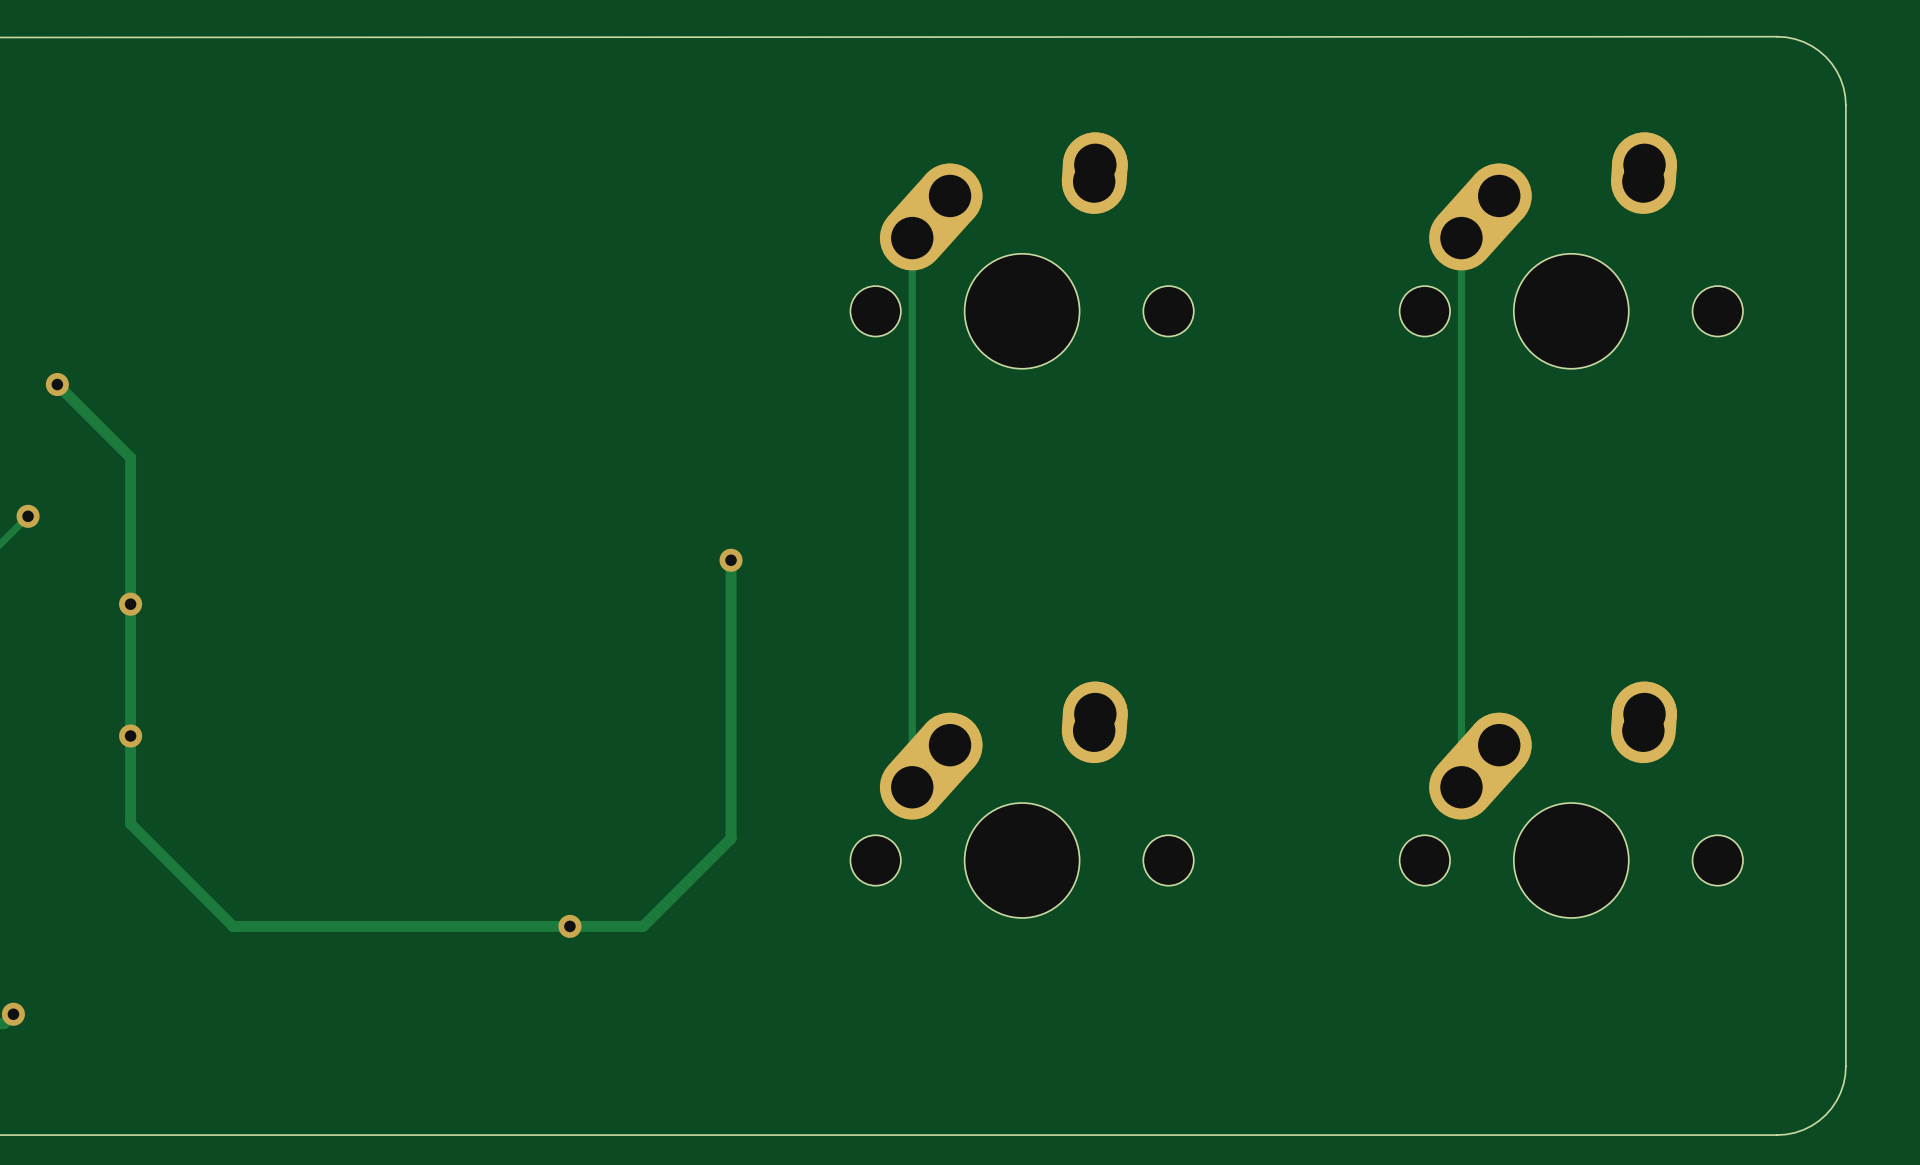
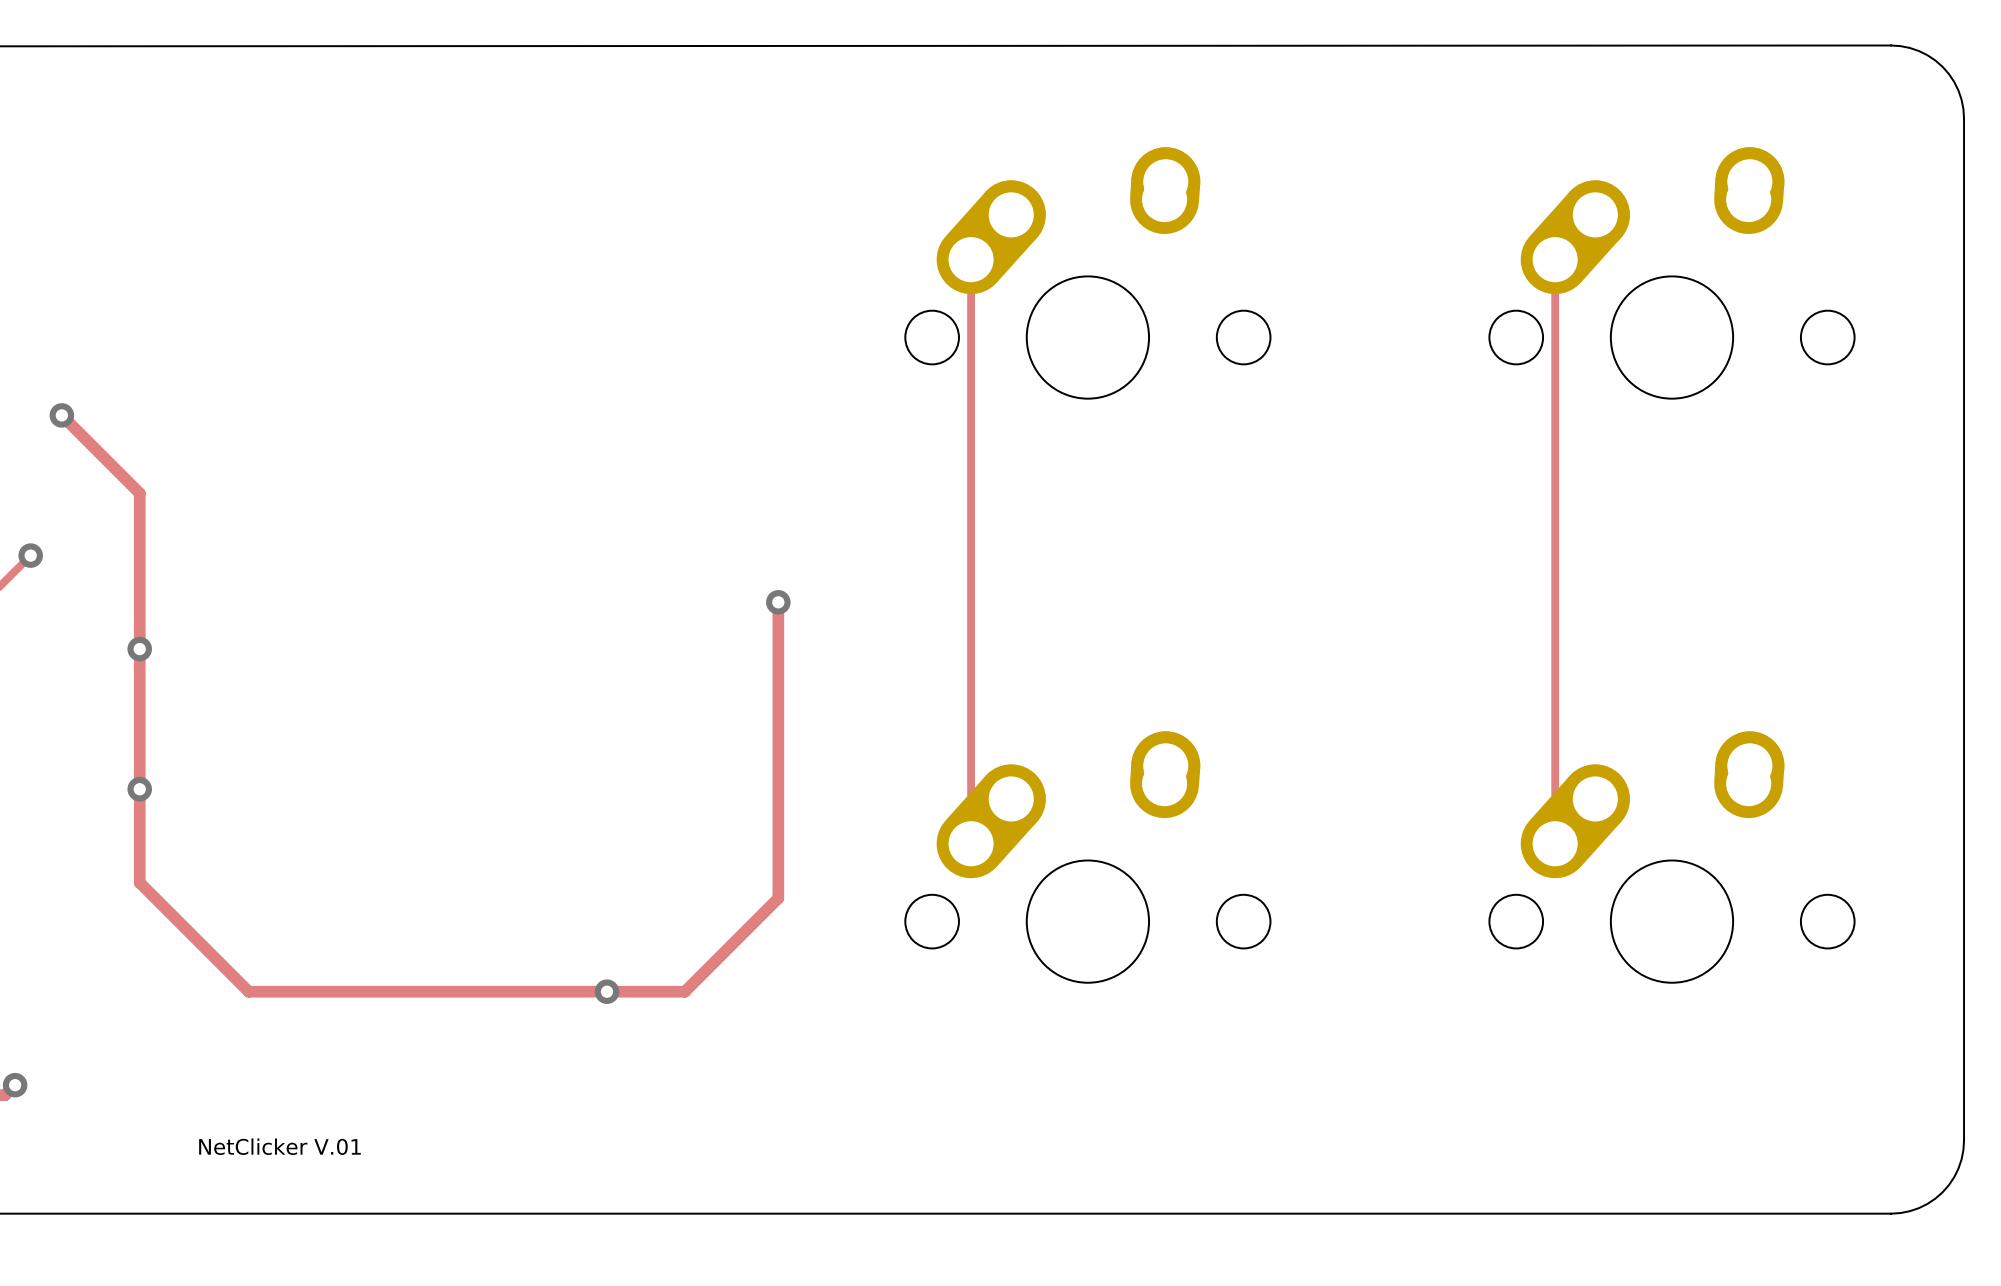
text: none -> NetClicker V.01 (279, 1146)

